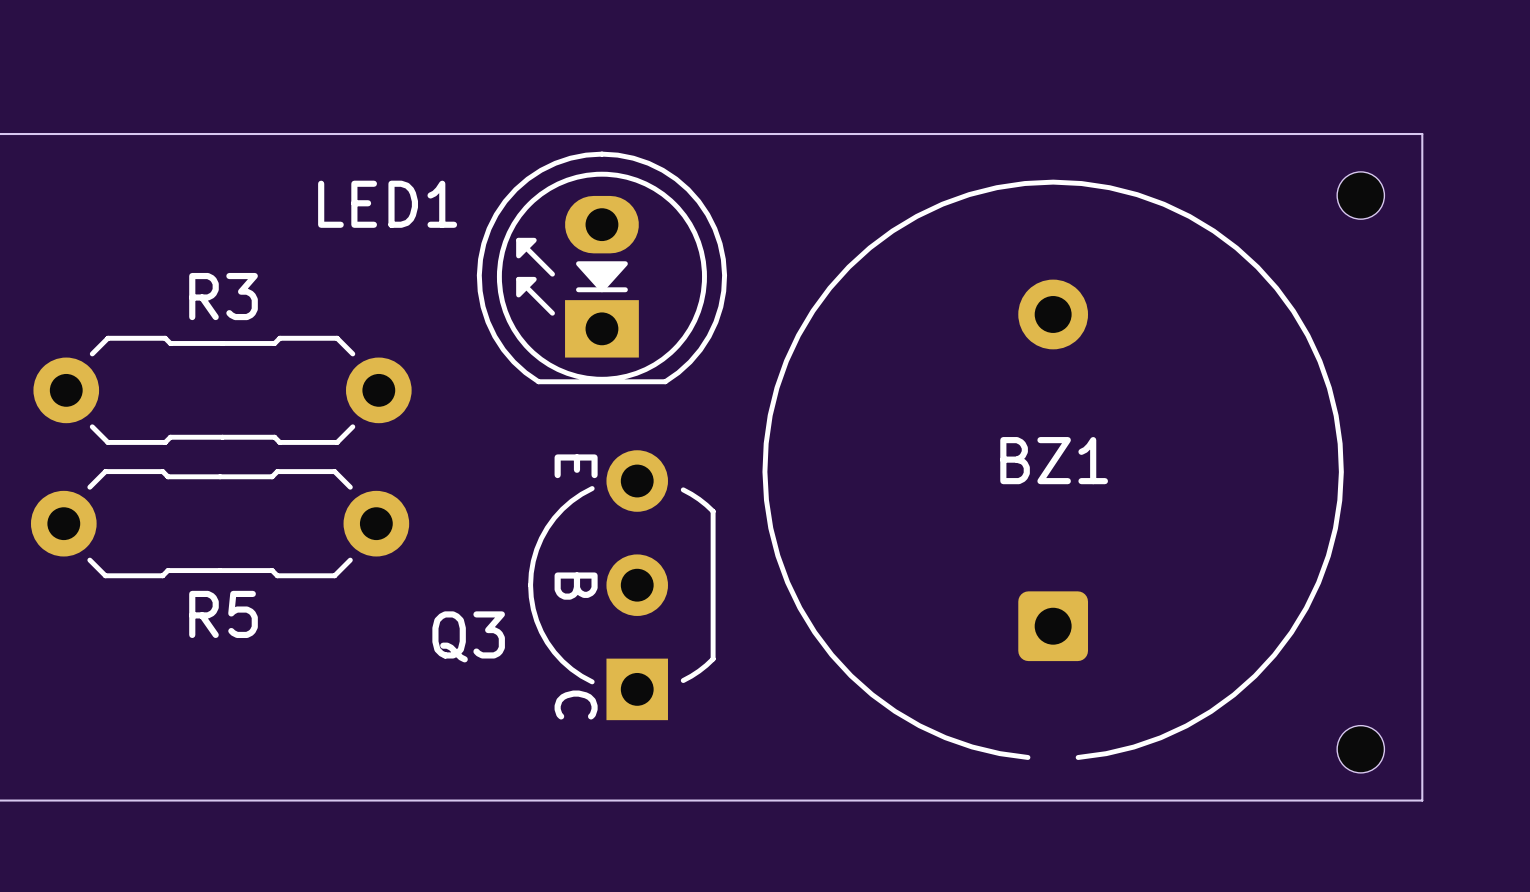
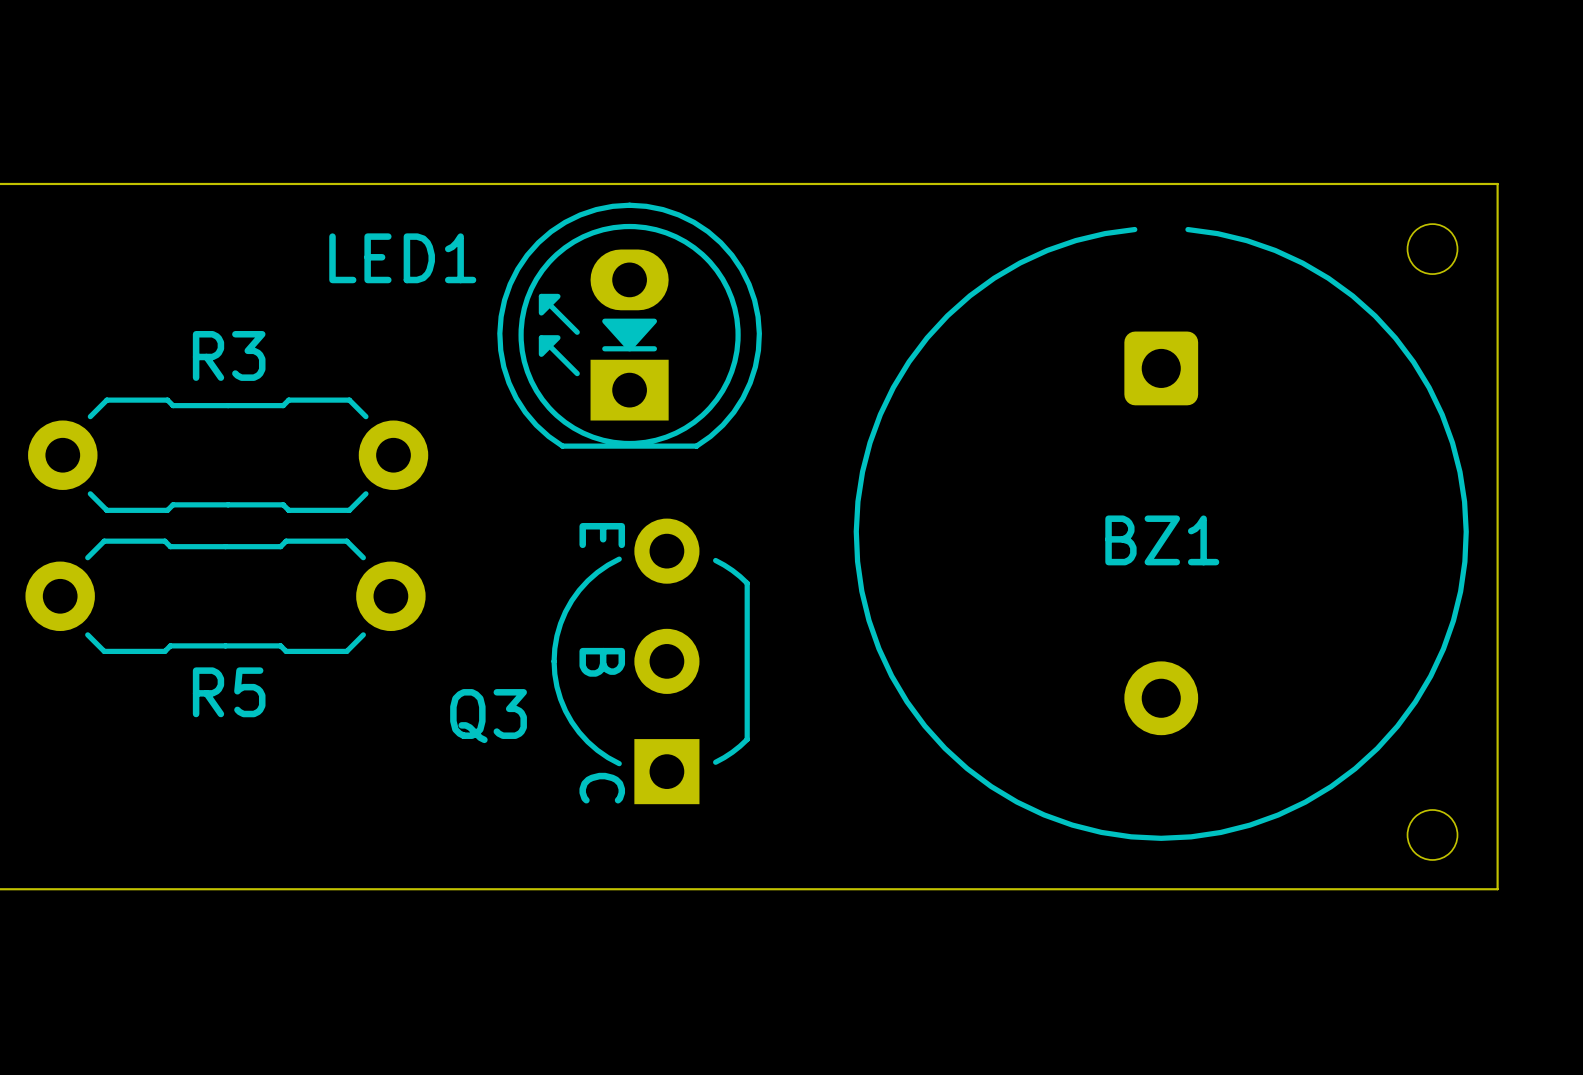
BZ1 rotation: 0° (1053, 469) -> 180° (1161, 533)

